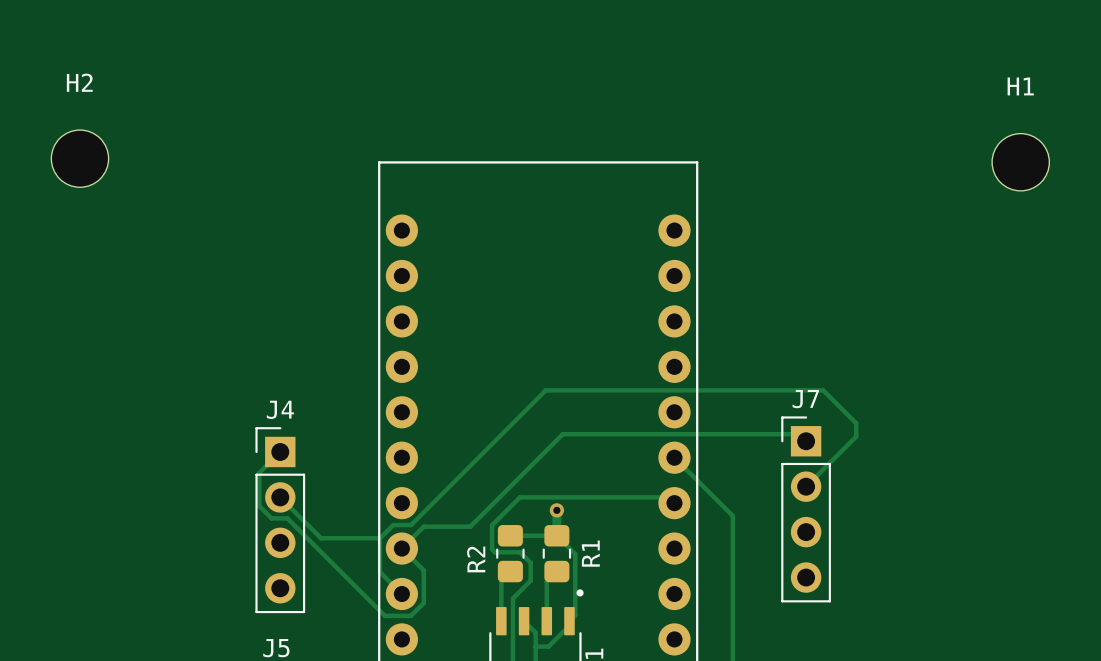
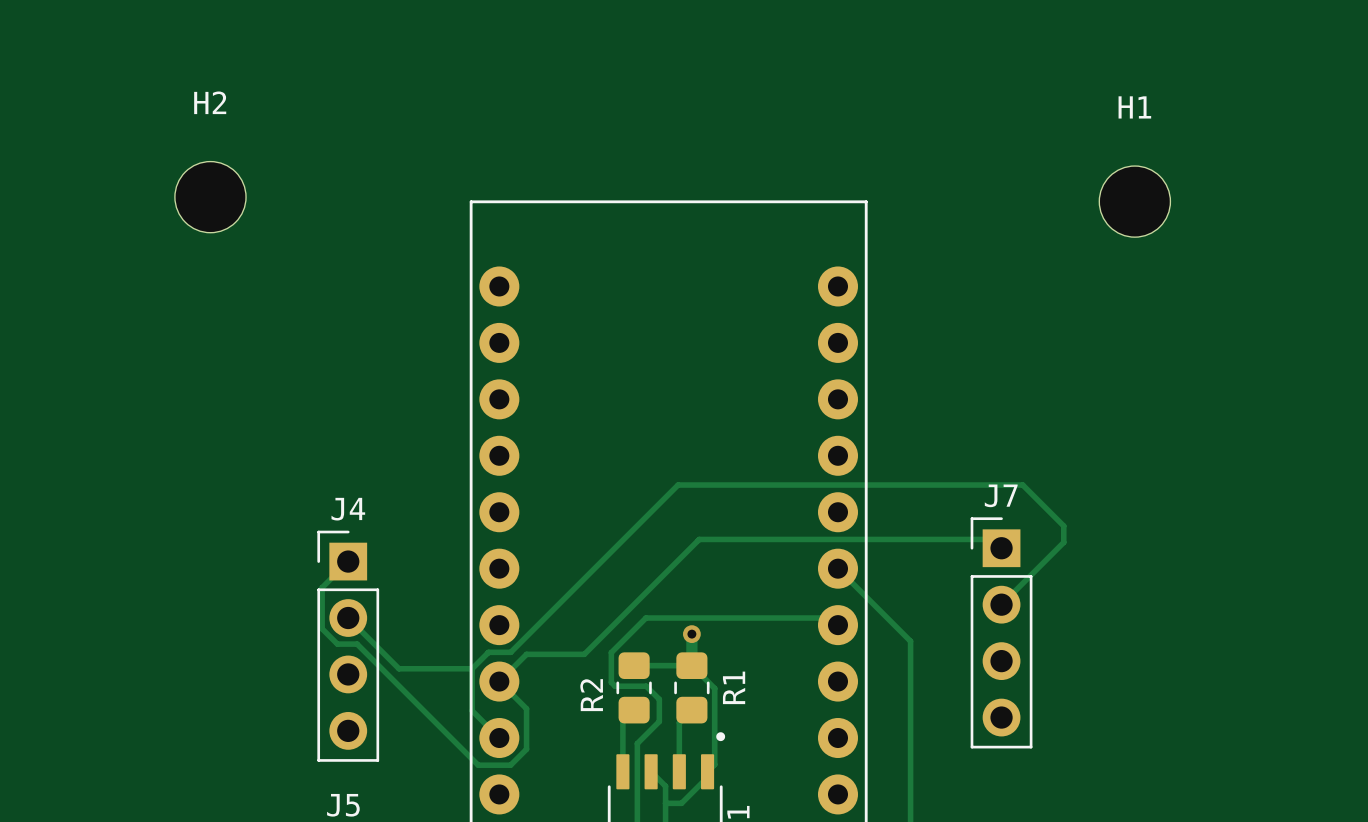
H2 position: (79, 158) -> (210, 197)
H1 position: (1020, 162) -> (1134, 201)

